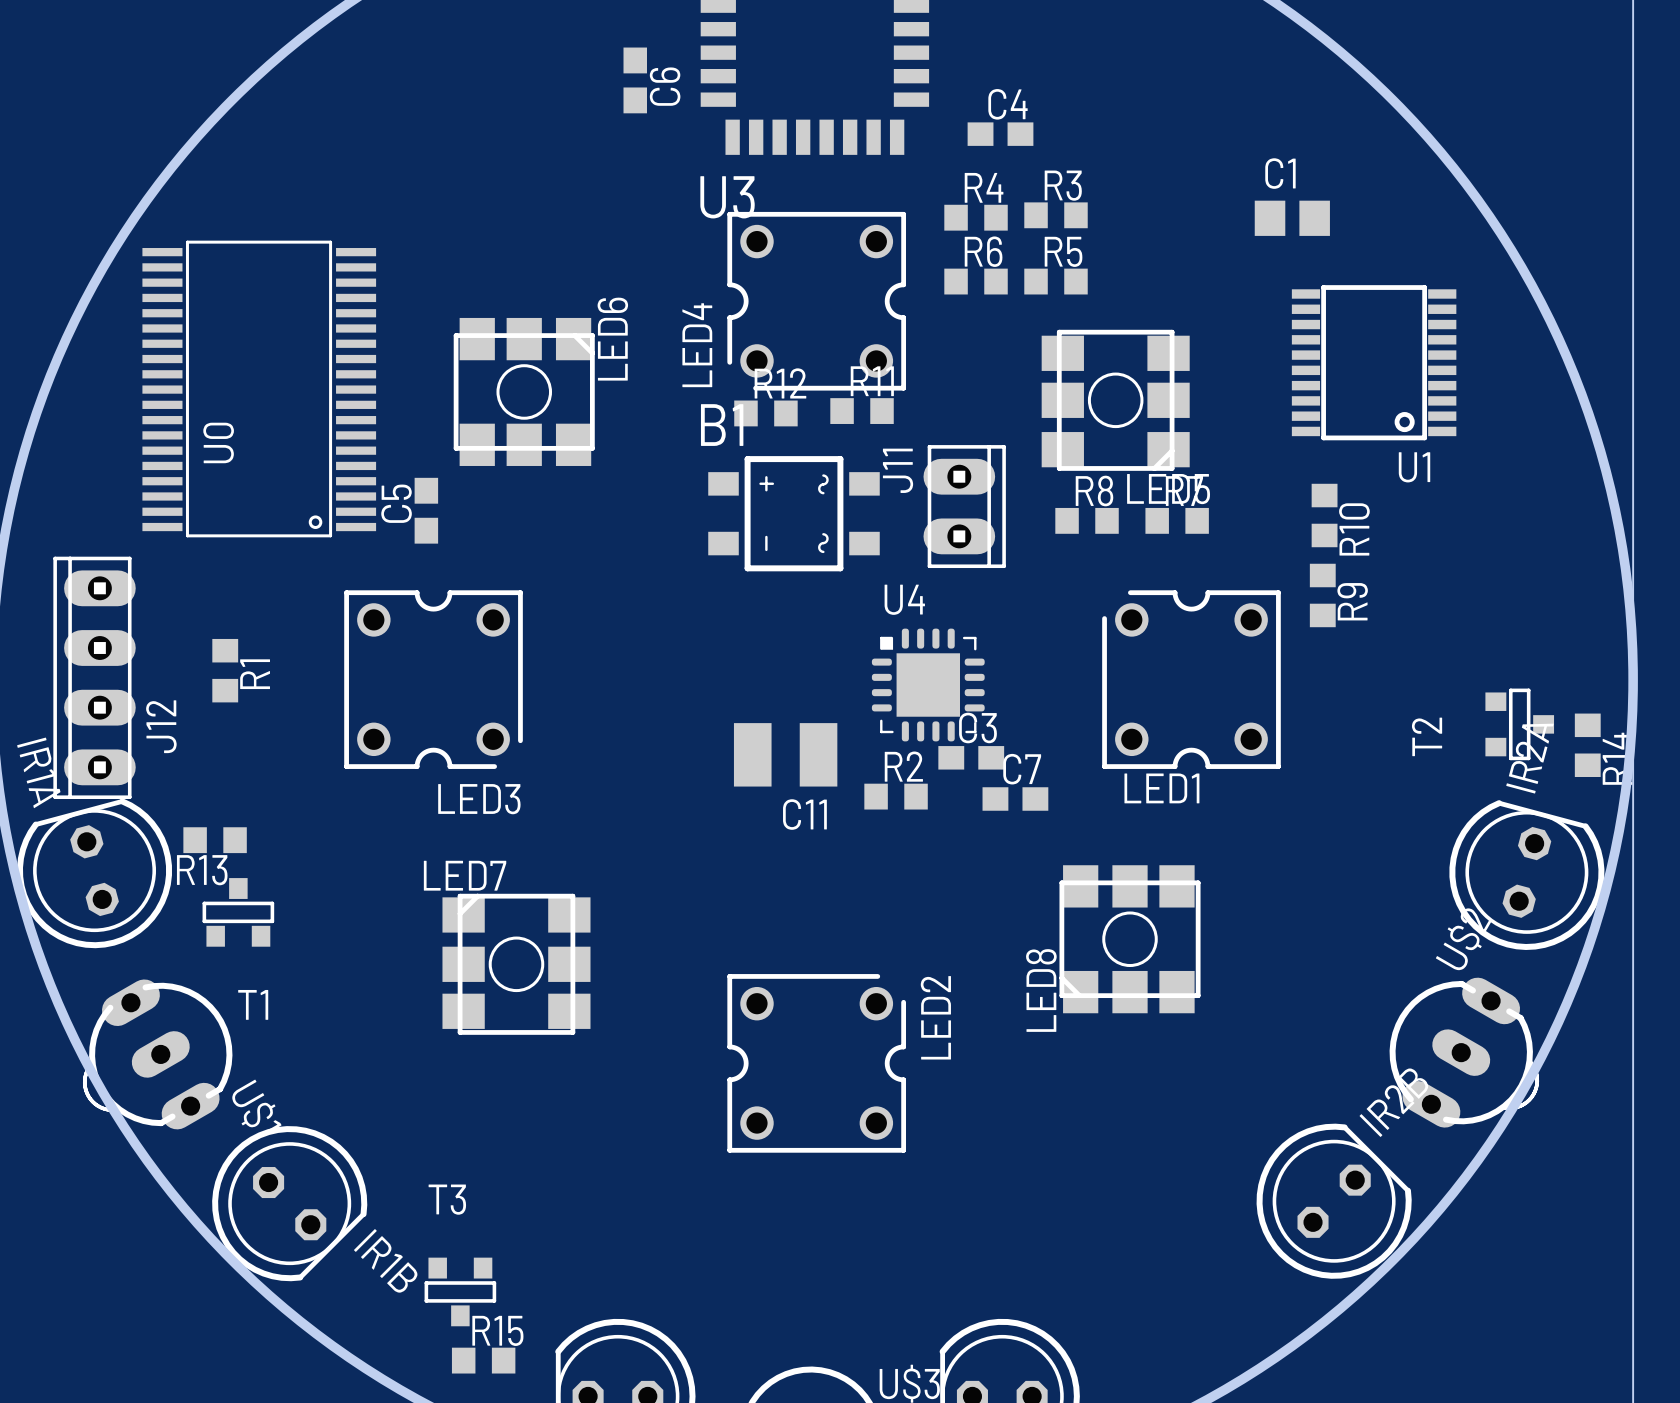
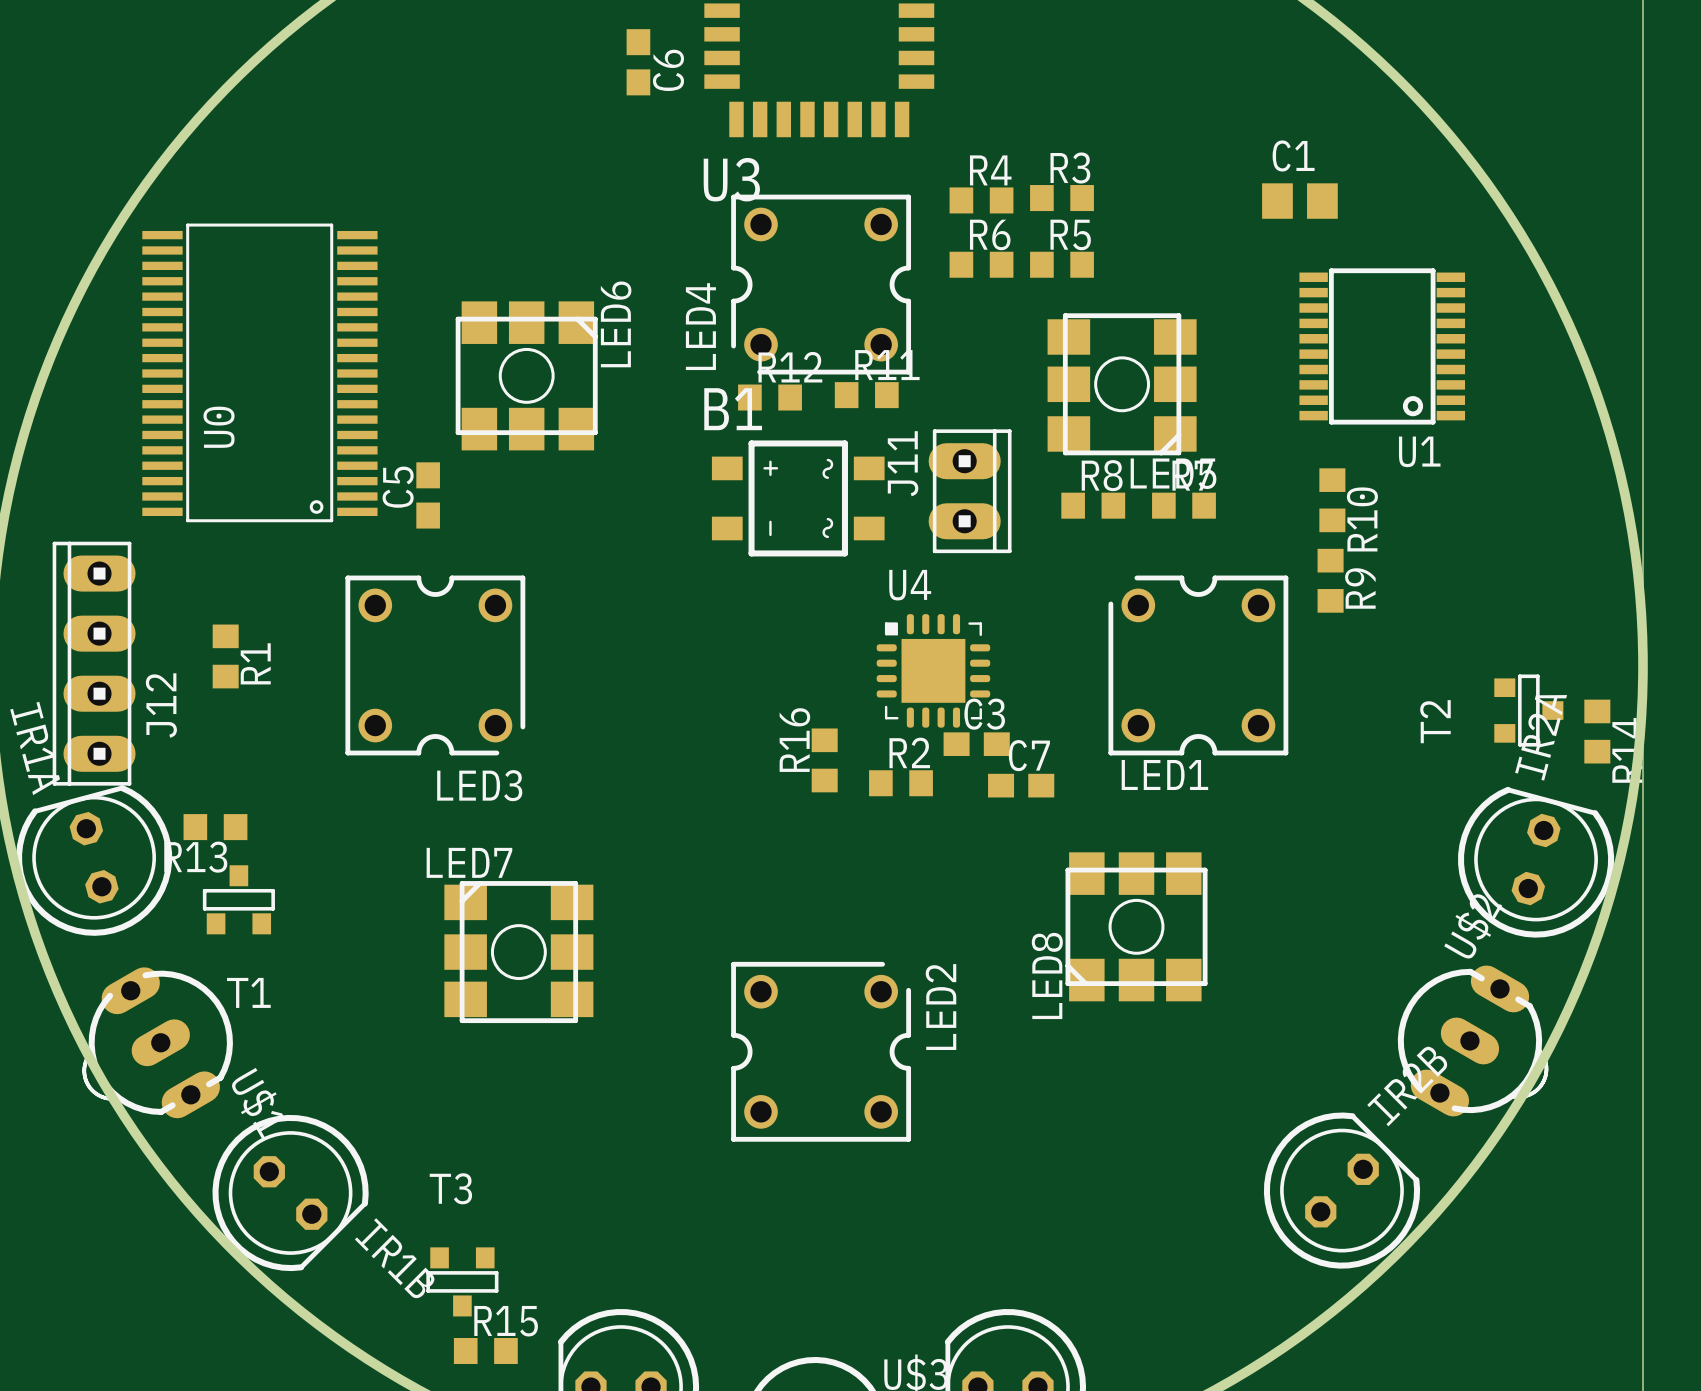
C4: (1000, 134) -> none
C11: (785, 754) -> none
R16: none -> (824, 760)

